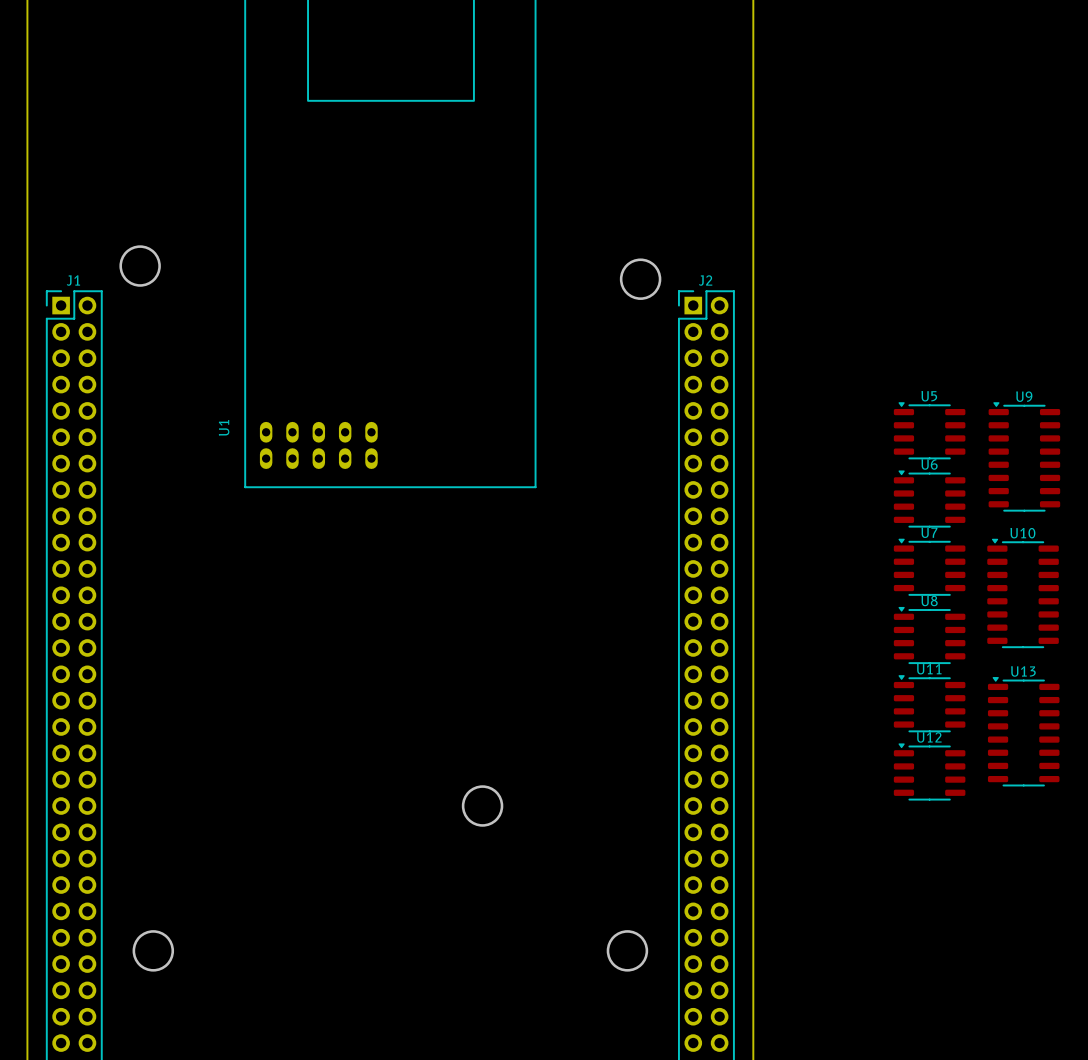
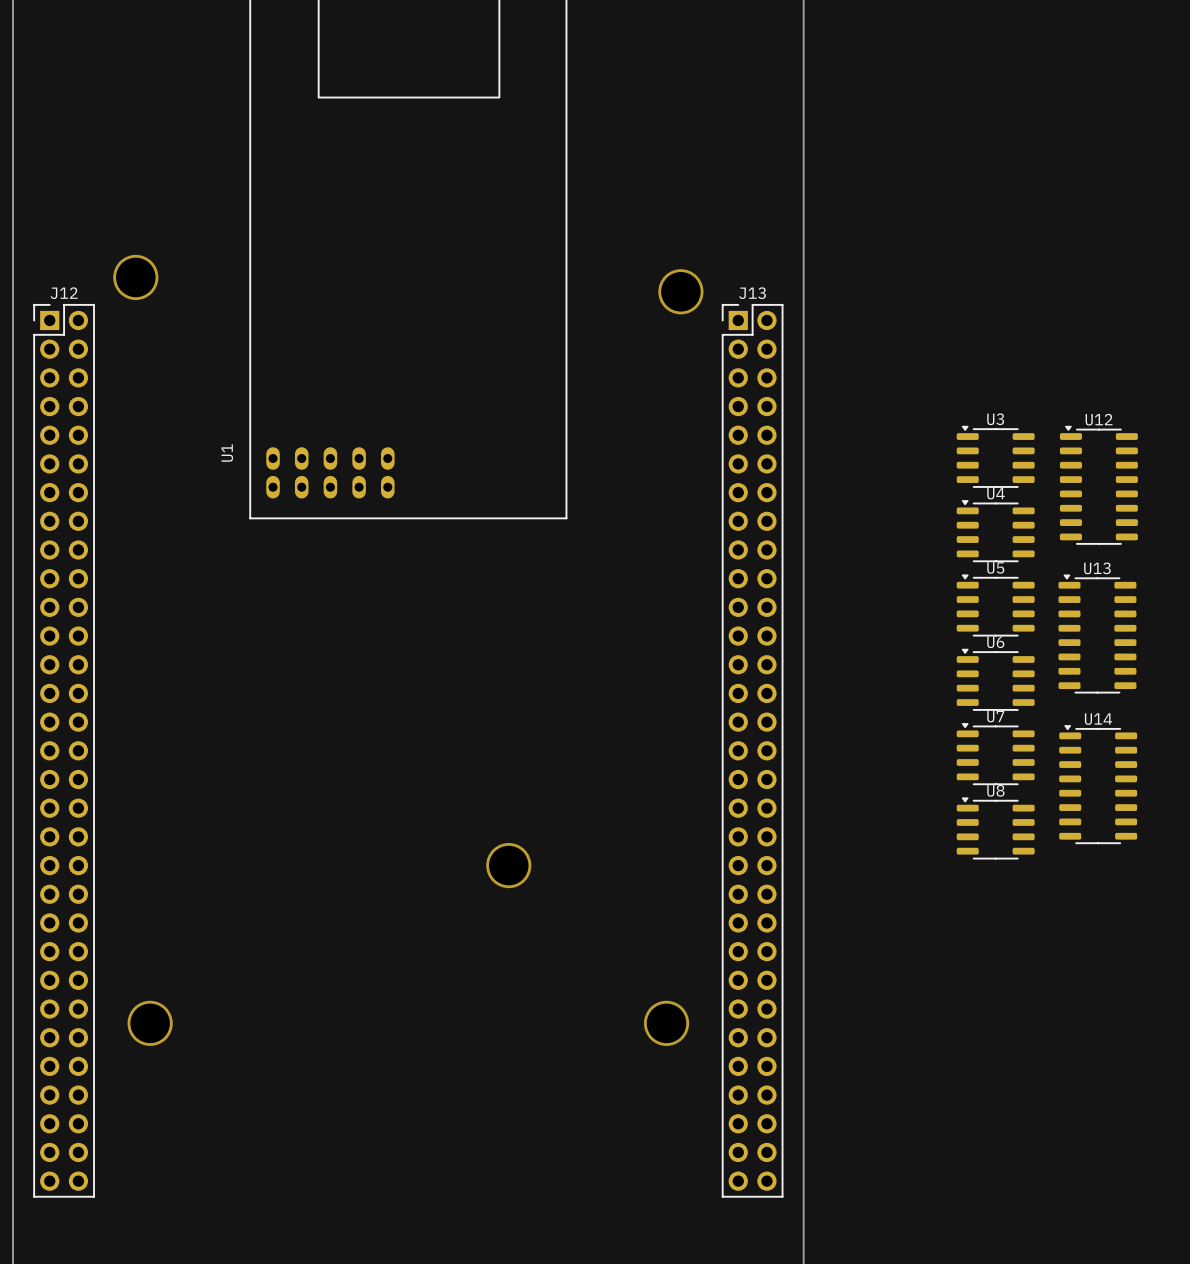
J1 name: J1 (73, 280) -> J12 (64, 293)
J2 name: J2 (705, 280) -> J13 (752, 293)
U5 name: U5 (929, 396) -> U3 (995, 419)
U9 name: U9 (1024, 396) -> U12 (1099, 419)
U6 name: U6 (929, 464) -> U4 (996, 493)
U7 name: U7 (929, 532) -> U5 (995, 567)
U10 name: U10 (1022, 533) -> U13 (1097, 568)
U8 name: U8 (929, 600) -> U6 (995, 642)
U11 name: U11 (929, 669) -> U7 (995, 716)
U13 name: U13 (1023, 671) -> U14 (1098, 719)
U12 name: U12 (929, 737) -> U8 (995, 790)

